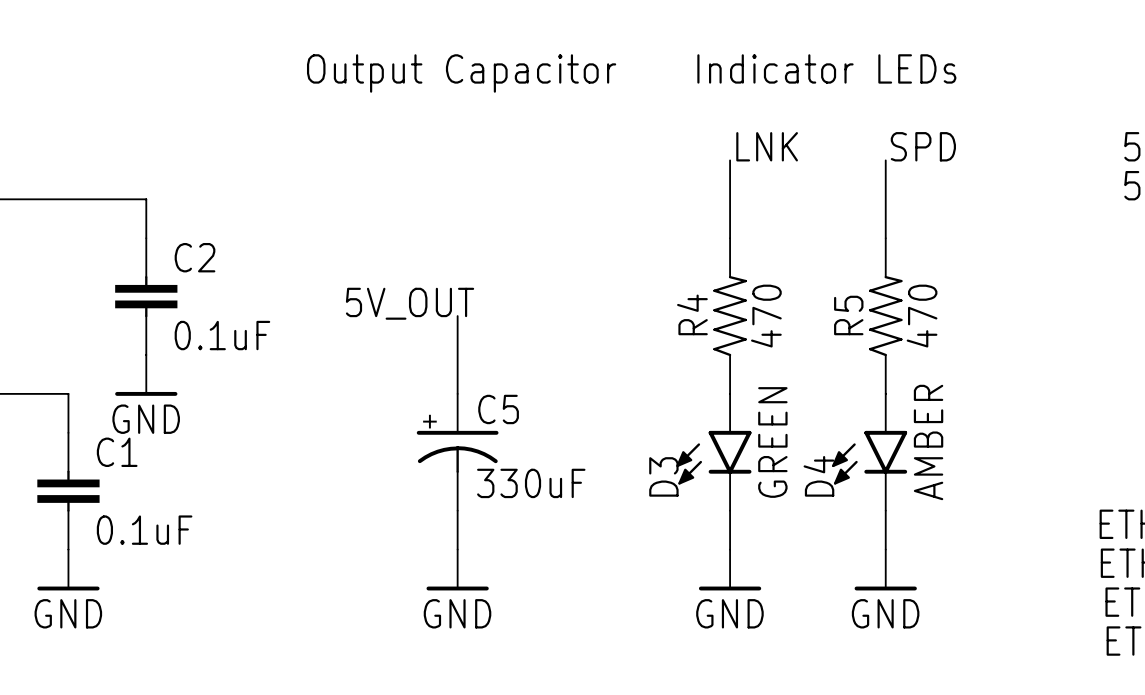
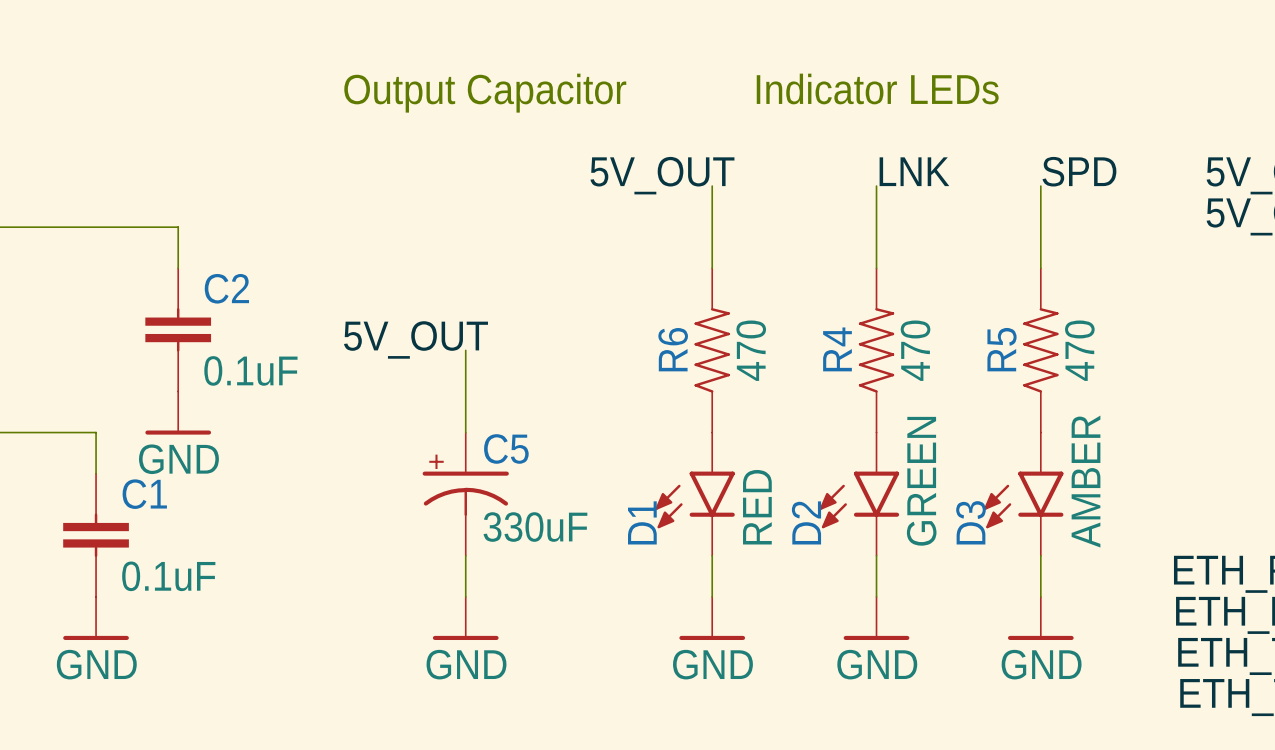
label position: LNK (767, 146) -> LNK (914, 171)
label position: SPD (923, 146) -> SPD (1079, 171)
label: none -> 5V_OUT (662, 175)
wire: (730, 160) (730, 238) -> (712, 186) (712, 268)
wire: (885, 160) (885, 238) -> (876, 186) (876, 268)
wire: none -> (1040, 186) (1040, 268)
label position: 5V_OUT (410, 303) -> 5V_OUT (415, 339)
wire: (457, 316) (457, 393) -> (465, 350) (465, 432)
R6: none -> 470 (712, 350)
R4 position: (730, 316) -> (876, 350)
R5 position: (885, 316) -> (1040, 350)
D3 value: GREEN (772, 442) -> AMBER (1086, 481)
C5 position: (457, 452) -> (465, 494)
D1: none -> RED (695, 494)
D3 position: (713, 452) -> (1023, 494)
D2: none -> GREEN (859, 494)
D4: AMBER (869, 452) -> none
wire: (457, 510) (457, 549) -> (465, 555) (465, 596)
wire: (730, 510) (730, 549) -> (712, 555) (712, 596)
wire: (885, 510) (885, 549) -> (876, 555) (876, 596)
wire: none -> (1040, 555) (1040, 596)
power symbol position: GND (457, 570) -> GND (465, 618)
power symbol: none -> GND (712, 618)
power symbol: GND (730, 570) -> none
power symbol: none -> GND (876, 618)
power symbol: GND (885, 570) -> none
power symbol: none -> GND (1040, 618)

